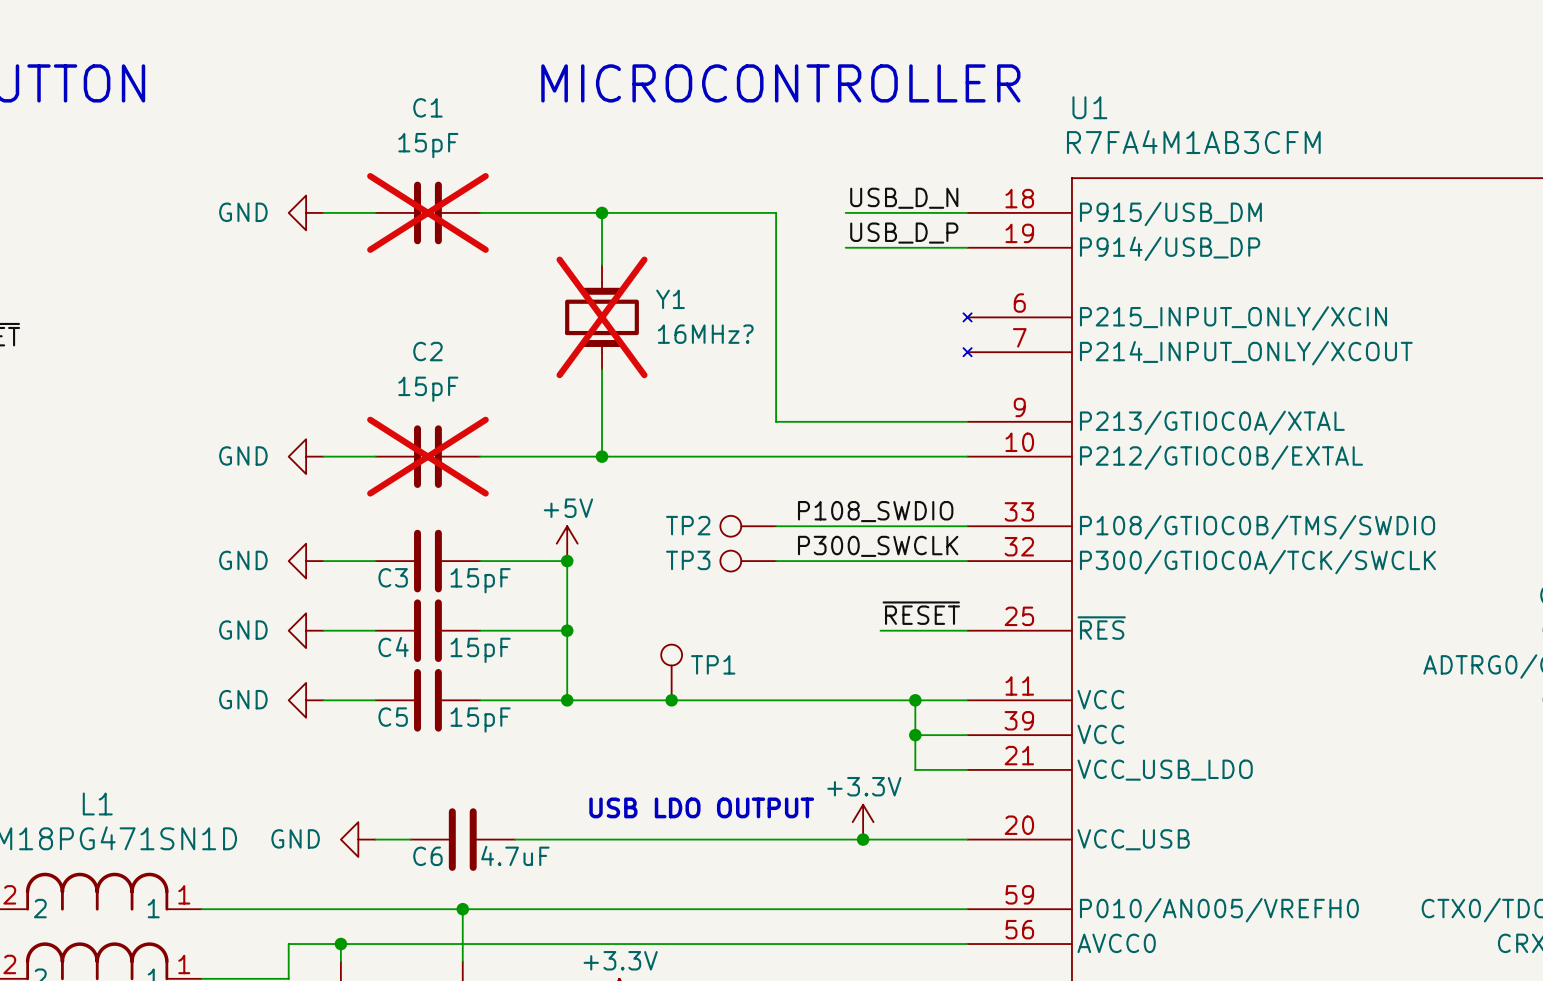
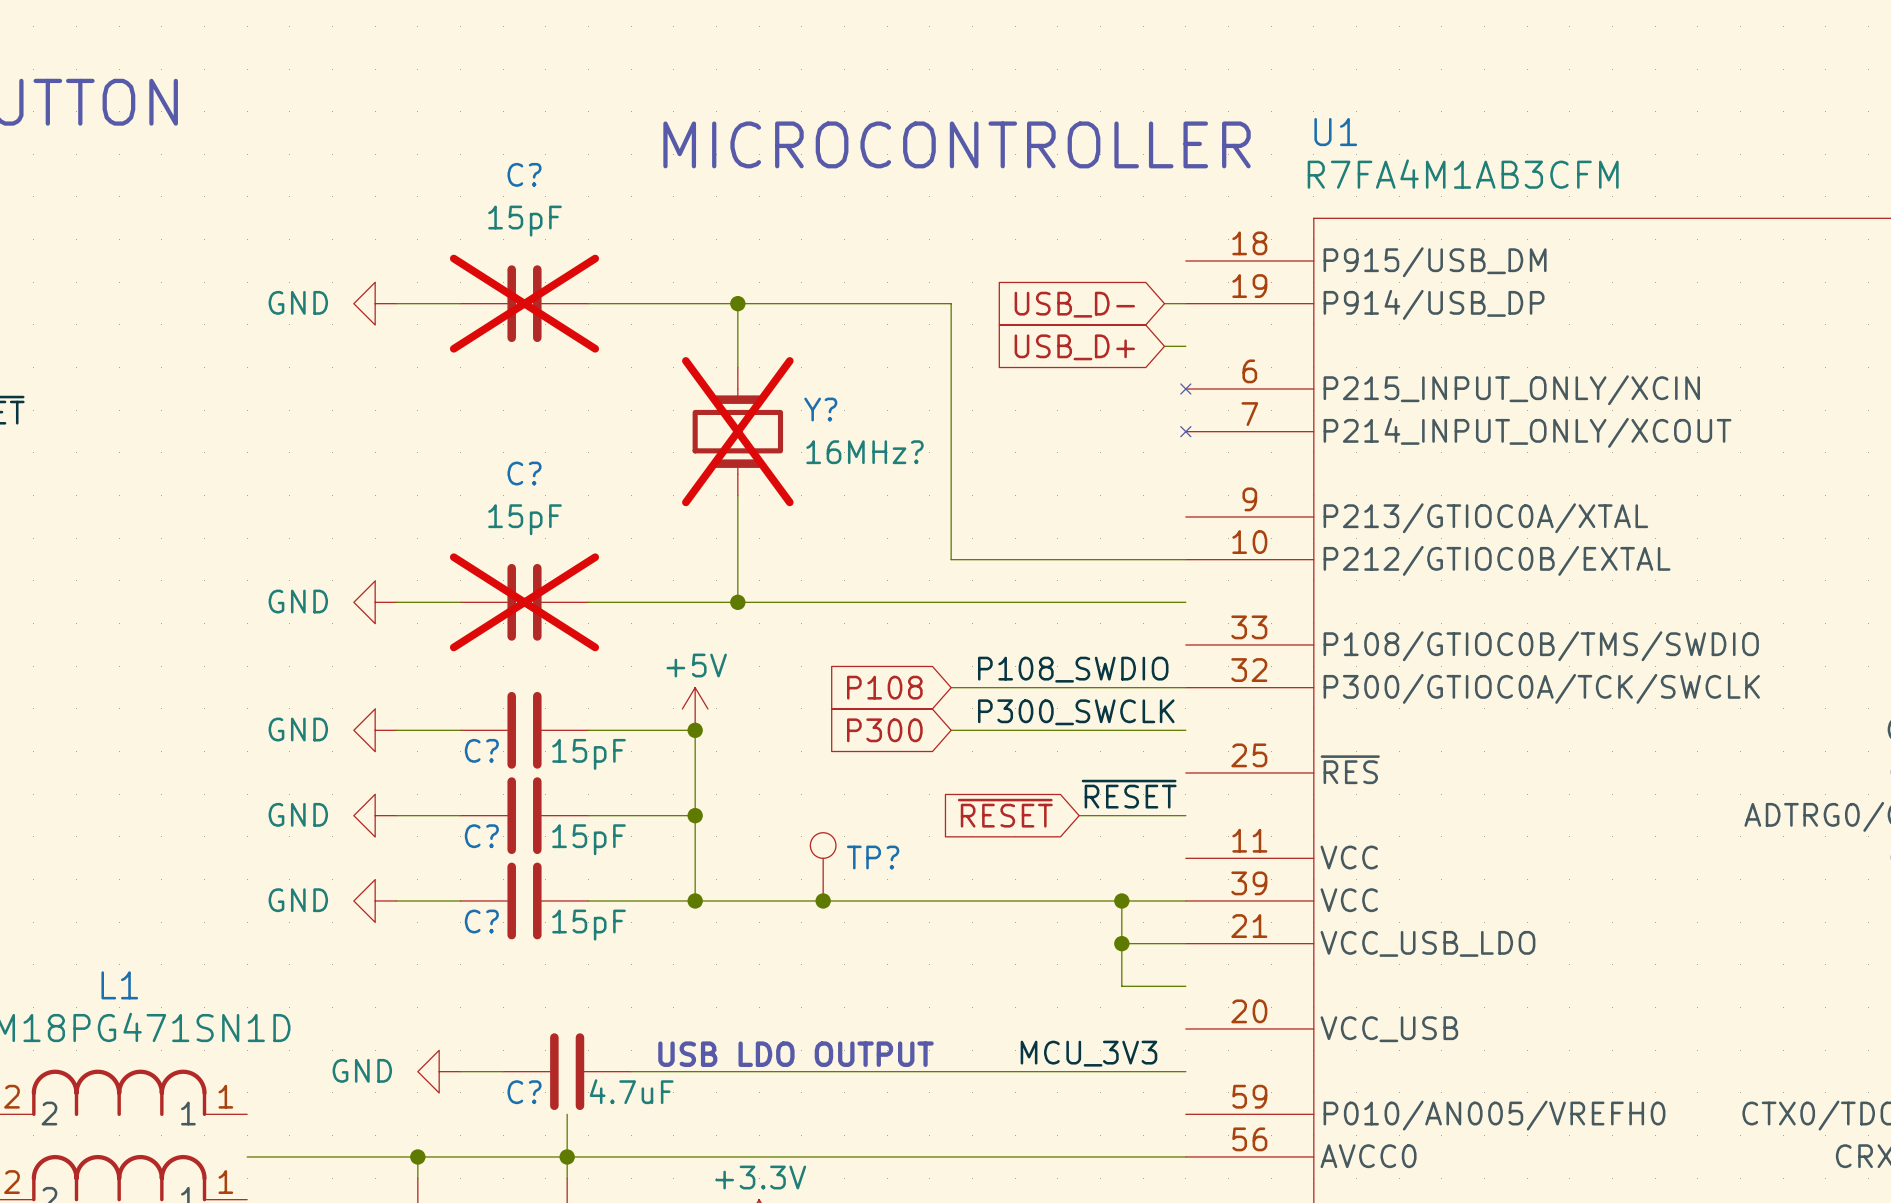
text position: MICROCONTROLLER (780, 83) -> MICROCONTROLLER (957, 144)
label: USB_D_N (904, 198) -> none
power symbol position: GND (306, 212) -> GND (375, 303)
wire: (323, 212) (375, 212) -> (396, 303) (460, 303)
C1: 15pF (427, 212) -> none
wire: (480, 212) (776, 212) (776, 247) -> (588, 303) (951, 303)
wire: (602, 212) (602, 247) -> (737, 559) (737, 602)
junction position: (602, 212) -> (737, 303)
wire: (845, 212) (967, 212) -> none
label: USB_D_P (904, 233) -> none
C?: none -> 15pF (524, 303)
wire: (845, 247) (950, 247) -> none
global label: none -> USB_D- (1074, 304)
wire: none -> (1164, 346) (1185, 346)
global label: none -> USB_D+ (1074, 347)
Y1: 16MHz? (602, 317) -> none
Y?: none -> 16MHz? (737, 431)
wire: (776, 421) (967, 421) -> (951, 516) (951, 559)
power symbol: GND (306, 456) -> none
wire: (323, 456) (375, 456) -> (396, 602) (460, 602)
C2: 15pF (427, 456) -> none
wire: (480, 456) (776, 456) -> none
junction position: (602, 456) -> (737, 602)
power symbol: none -> GND (375, 602)
C?: none -> 15pF (524, 602)
label: P108_SWDIO (875, 511) -> none
TP2: (748, 526) -> none
wire: (776, 526) (967, 526) -> (951, 730) (1185, 730)
power symbol position: +5V (567, 543) -> +5V (695, 708)
label: P300_SWCLK (878, 546) -> P108_SWDIO (1073, 669)
power symbol: GND (306, 561) -> none
wire: (323, 561) (375, 561) -> (396, 730) (460, 730)
C3: 15pF (427, 561) -> none
wire: (480, 561) (567, 561) (567, 595) -> (588, 730) (695, 730)
junction: (567, 561) -> none
global label: none -> P108 (884, 687)
TP3: (748, 561) -> none
label: none -> P300_SWCLK (1076, 712)
power symbol: none -> GND (375, 730)
C?: none -> 15pF (524, 730)
junction: none -> (695, 730)
global label: none -> P300 (884, 730)
label position: ~{RESET} (921, 613) -> ~{RESET} (1129, 794)
power symbol: GND (306, 630) -> none
wire: (323, 630) (375, 630) -> (396, 815) (460, 815)
C4: 15pF (427, 630) -> none
wire: (480, 630) (567, 630) -> (588, 815) (695, 815)
junction: (567, 630) -> none
wire: (880, 630) (967, 630) -> (1079, 815) (1185, 815)
global label: none -> ~{RESET} (1005, 813)
power symbol: none -> GND (375, 815)
C?: none -> 15pF (524, 815)
junction: none -> (695, 815)
TP1: (671, 672) -> none
power symbol: GND (306, 700) -> none
wire: (323, 700) (375, 700) -> (396, 900) (460, 900)
C5: 15pF (427, 700) -> none
wire: (480, 700) (967, 700) -> (588, 602) (1185, 602)
wire: none -> (695, 858) (695, 900)
junction: (567, 700) -> none
junction position: (671, 700) -> (823, 900)
wire: (915, 700) (915, 735) -> (588, 900) (1121, 900)
junction: (915, 700) -> none
TP?: none -> (823, 866)
power symbol: none -> GND (375, 900)
C?: none -> 15pF (524, 900)
junction: none -> (695, 900)
wire: none -> (1121, 943) (1121, 986) (1185, 986)
junction: none -> (1121, 943)
text position: USB LDO OUTPUT (701, 807) -> USB LDO OUTPUT (796, 1054)
power symbol: +3.3V (863, 822) -> none
power symbol position: GND (358, 839) -> GND (439, 1071)
wire: (375, 839) (410, 839) -> (460, 1071) (503, 1071)
C6: 4.7uF (462, 839) -> none
wire: (514, 839) (967, 839) -> (631, 1071) (1185, 1071)
junction: (863, 839) -> none
label: none -> MCU_3V3 (1088, 1053)
C?: none -> 4.7uF (567, 1071)
wire: (201, 909) (967, 909) -> none
junction position: (462, 909) -> (567, 1156)
wire: (288, 944) (288, 978) (201, 978) -> (353, 1156) (247, 1156)

